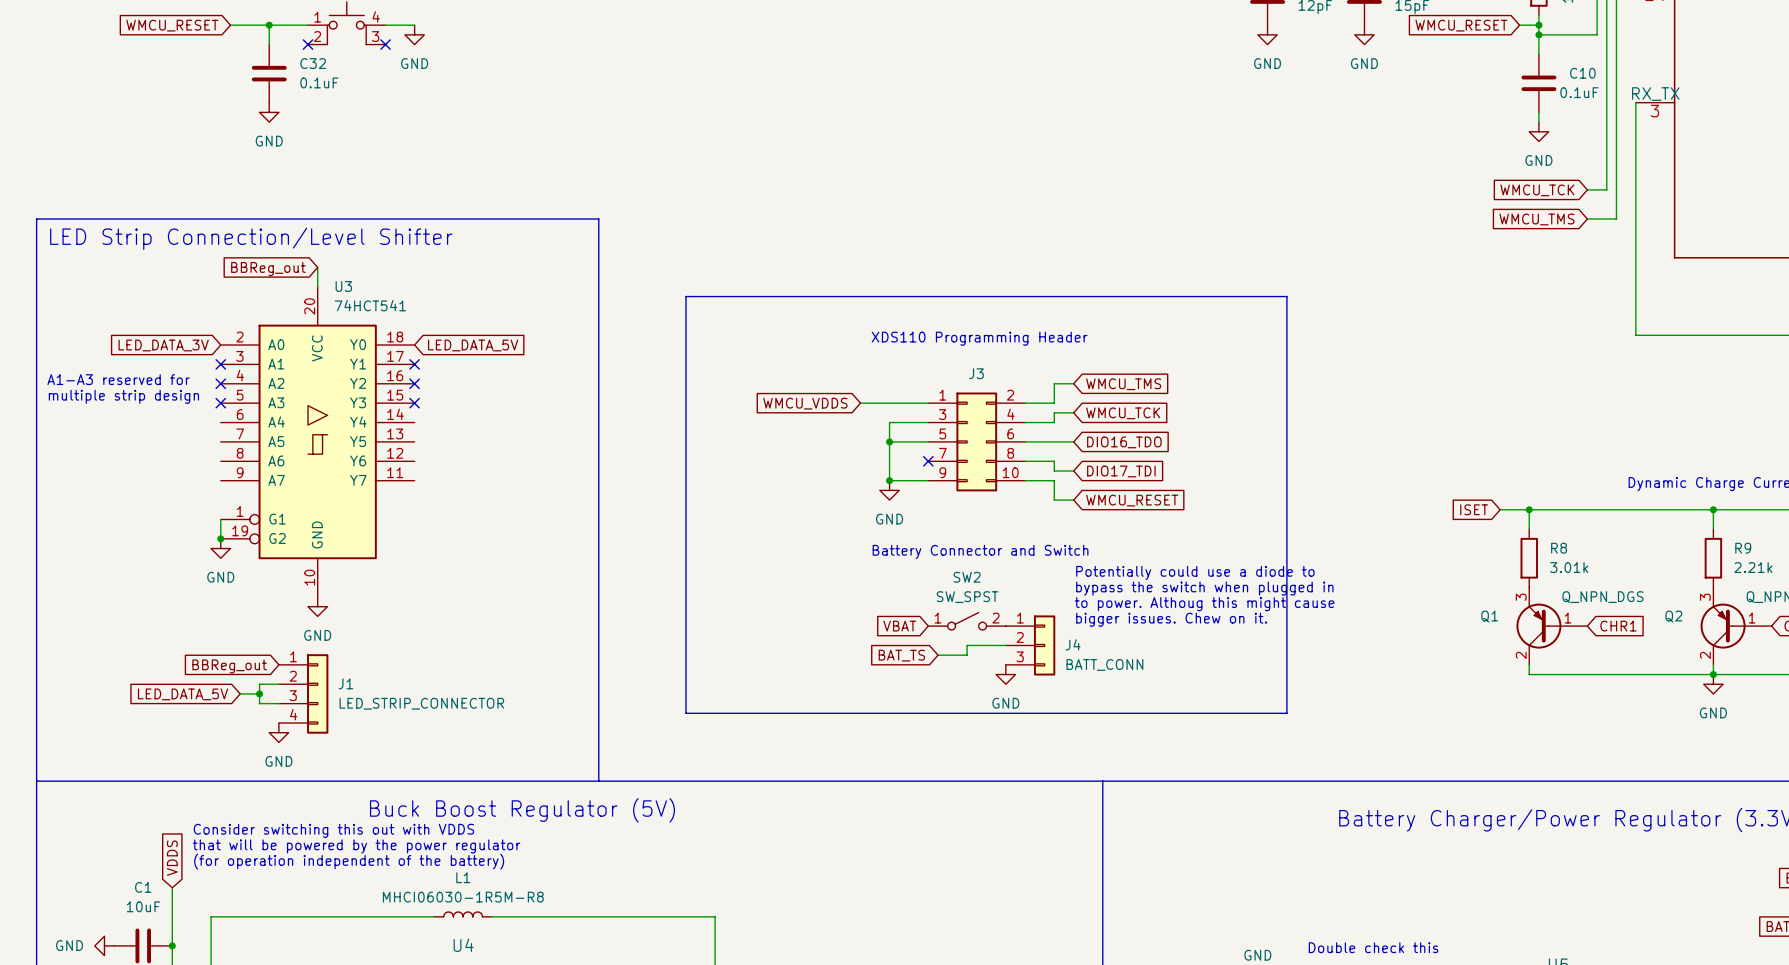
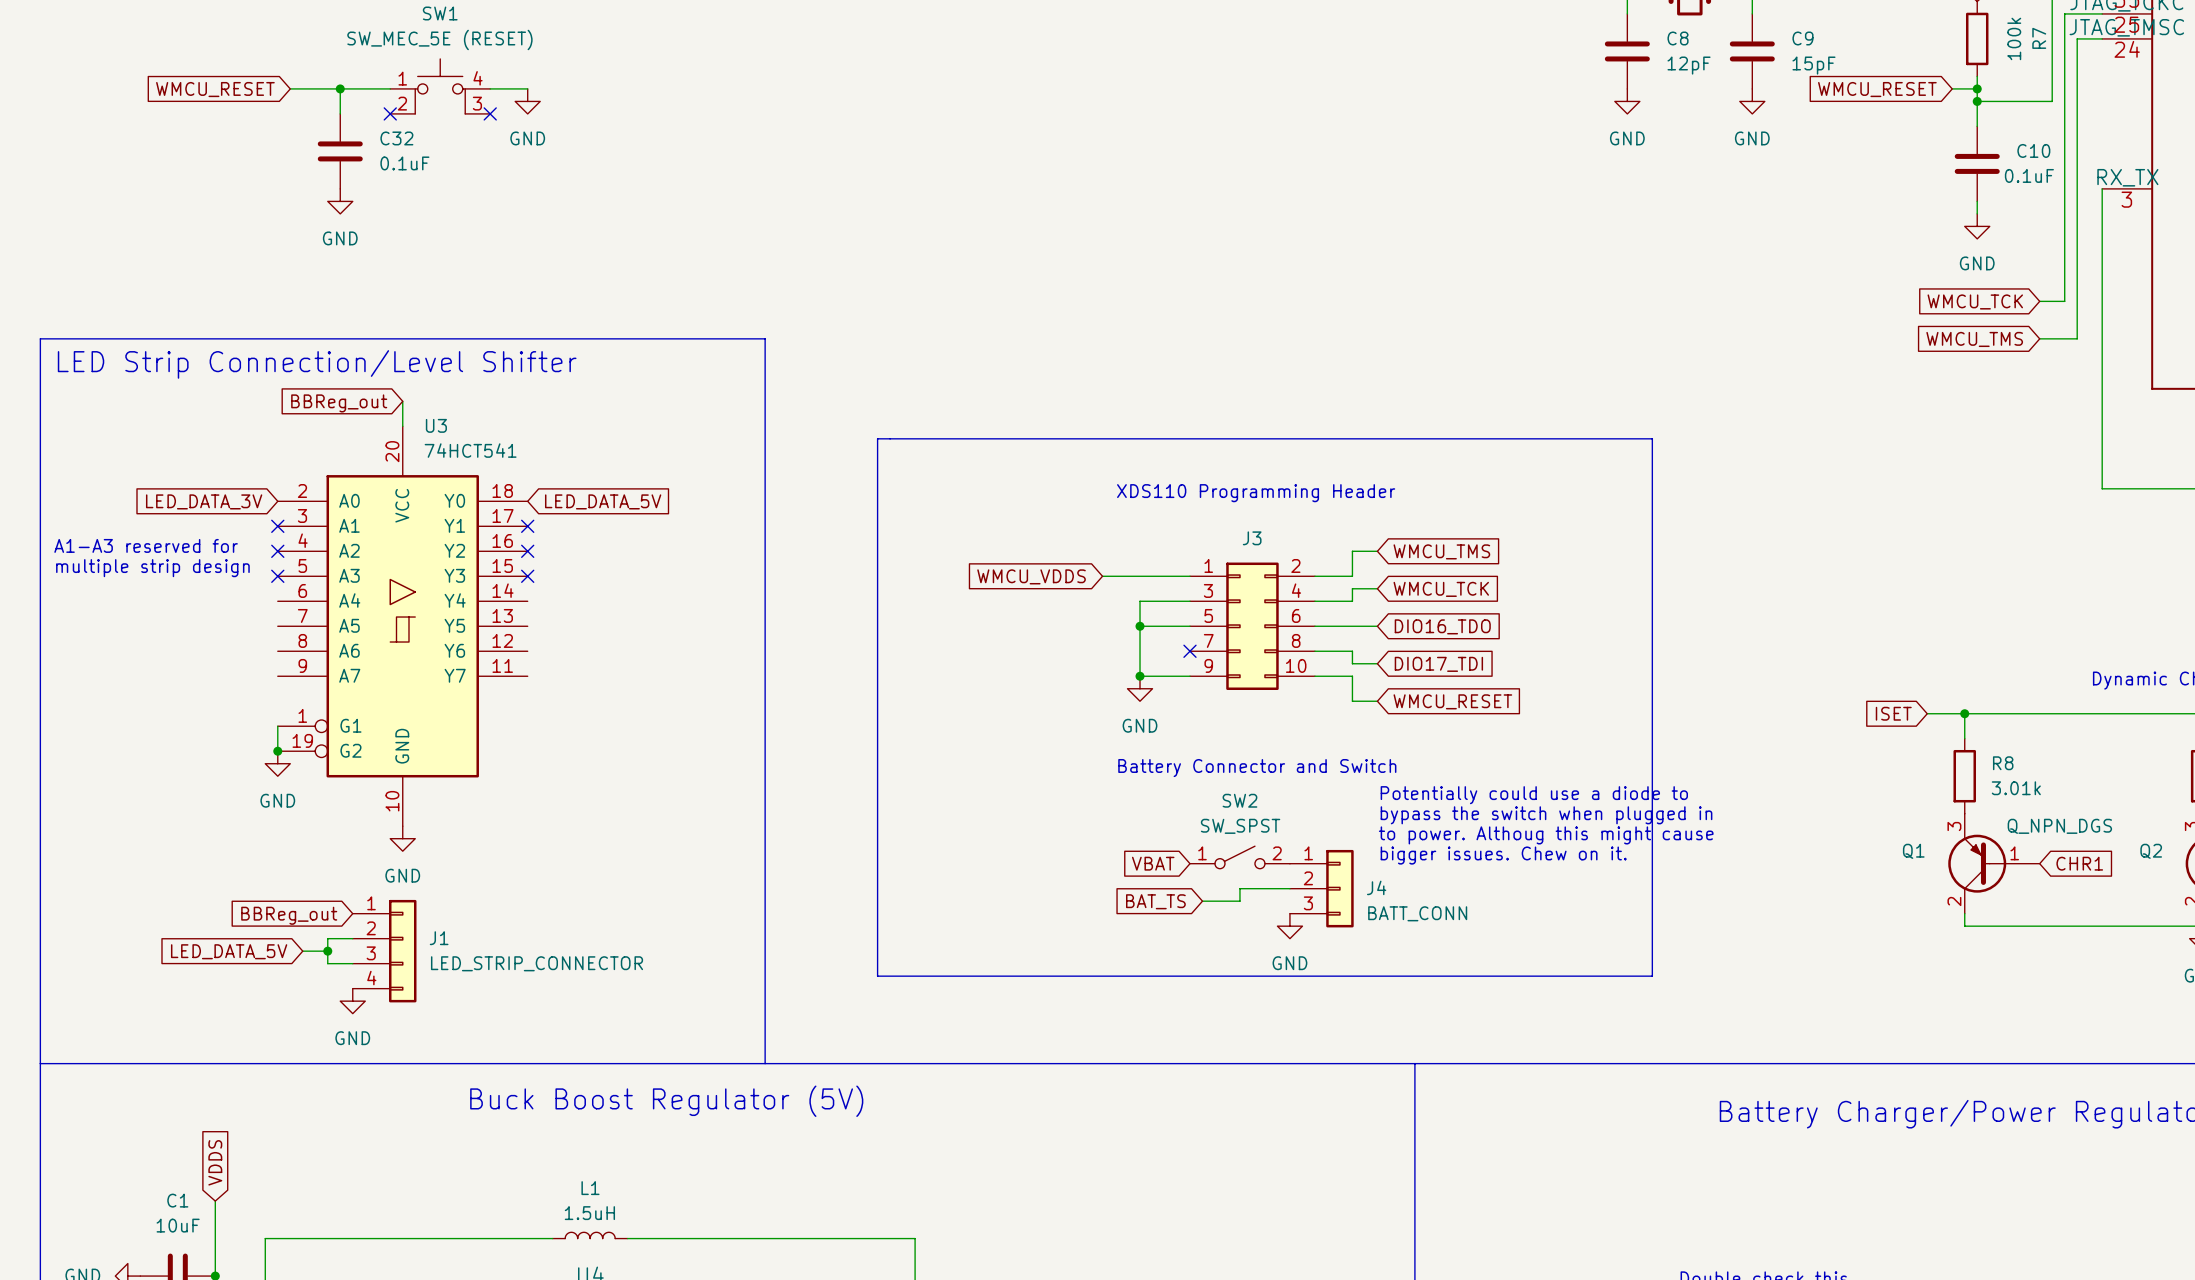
text: Consider switching this out with VDDS (333, 830) -> none
text: that will be powered by the power regulator (356, 846) -> none
text: (for operation independent of the battery) (349, 861) -> none
L1 value: MHCI06030-1R5M-R8 (463, 897) -> 1.5uH (589, 1213)

